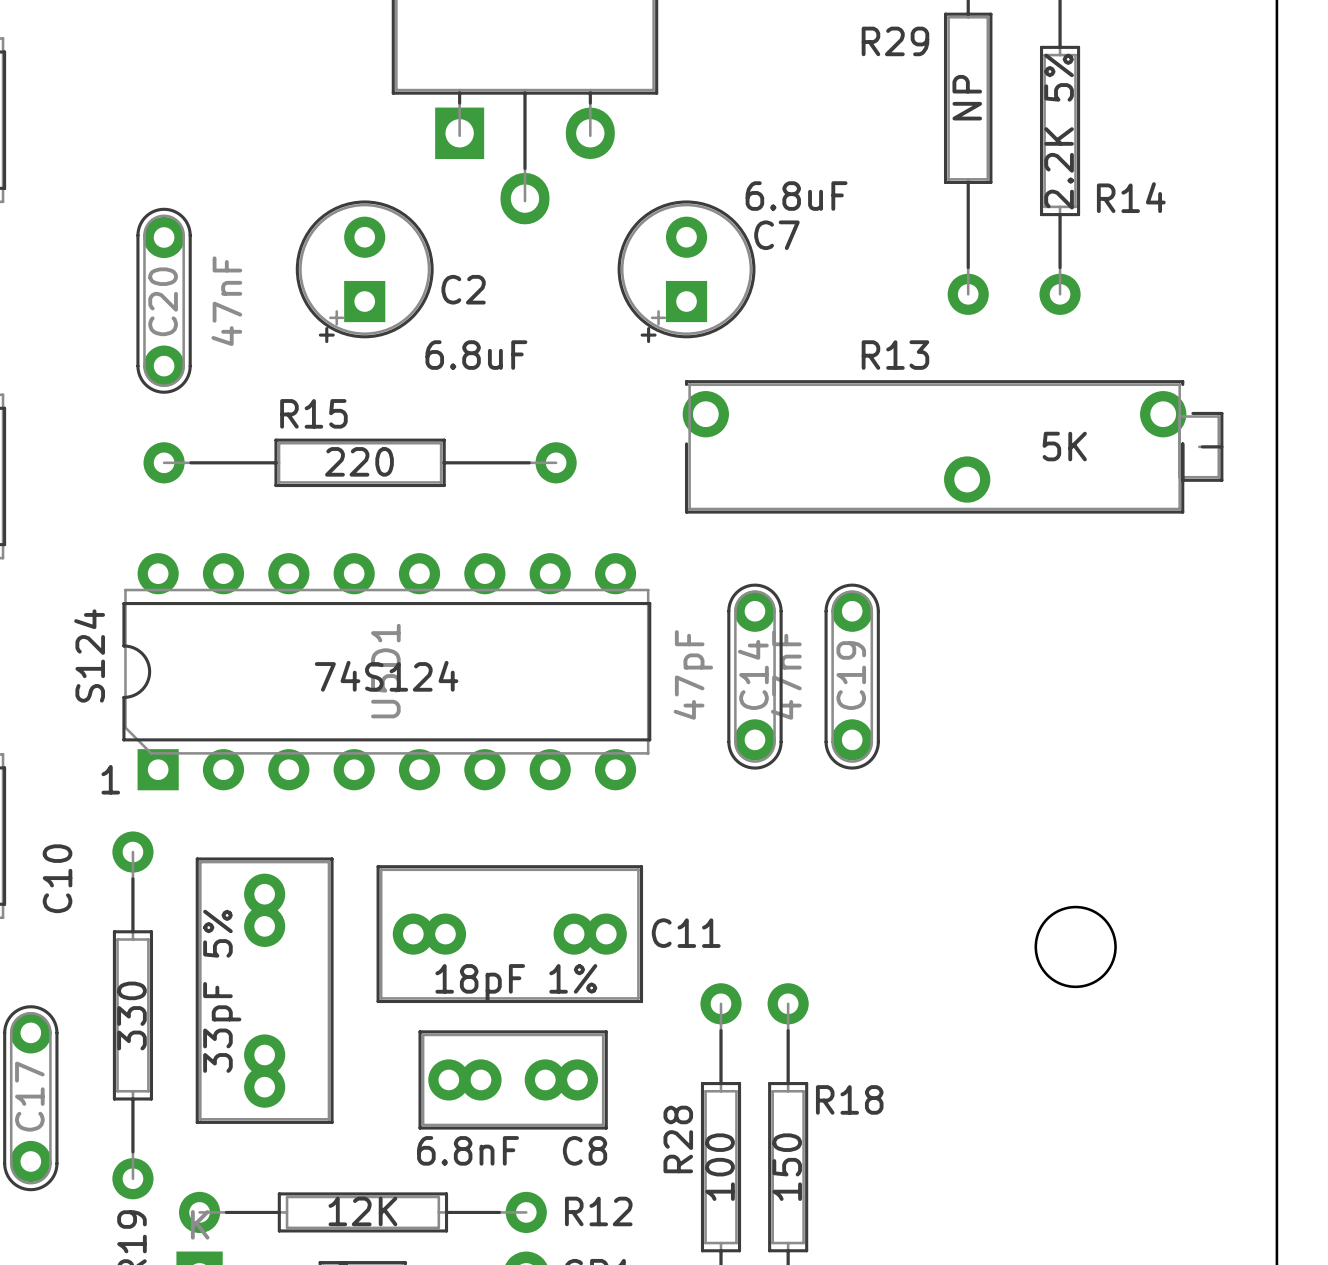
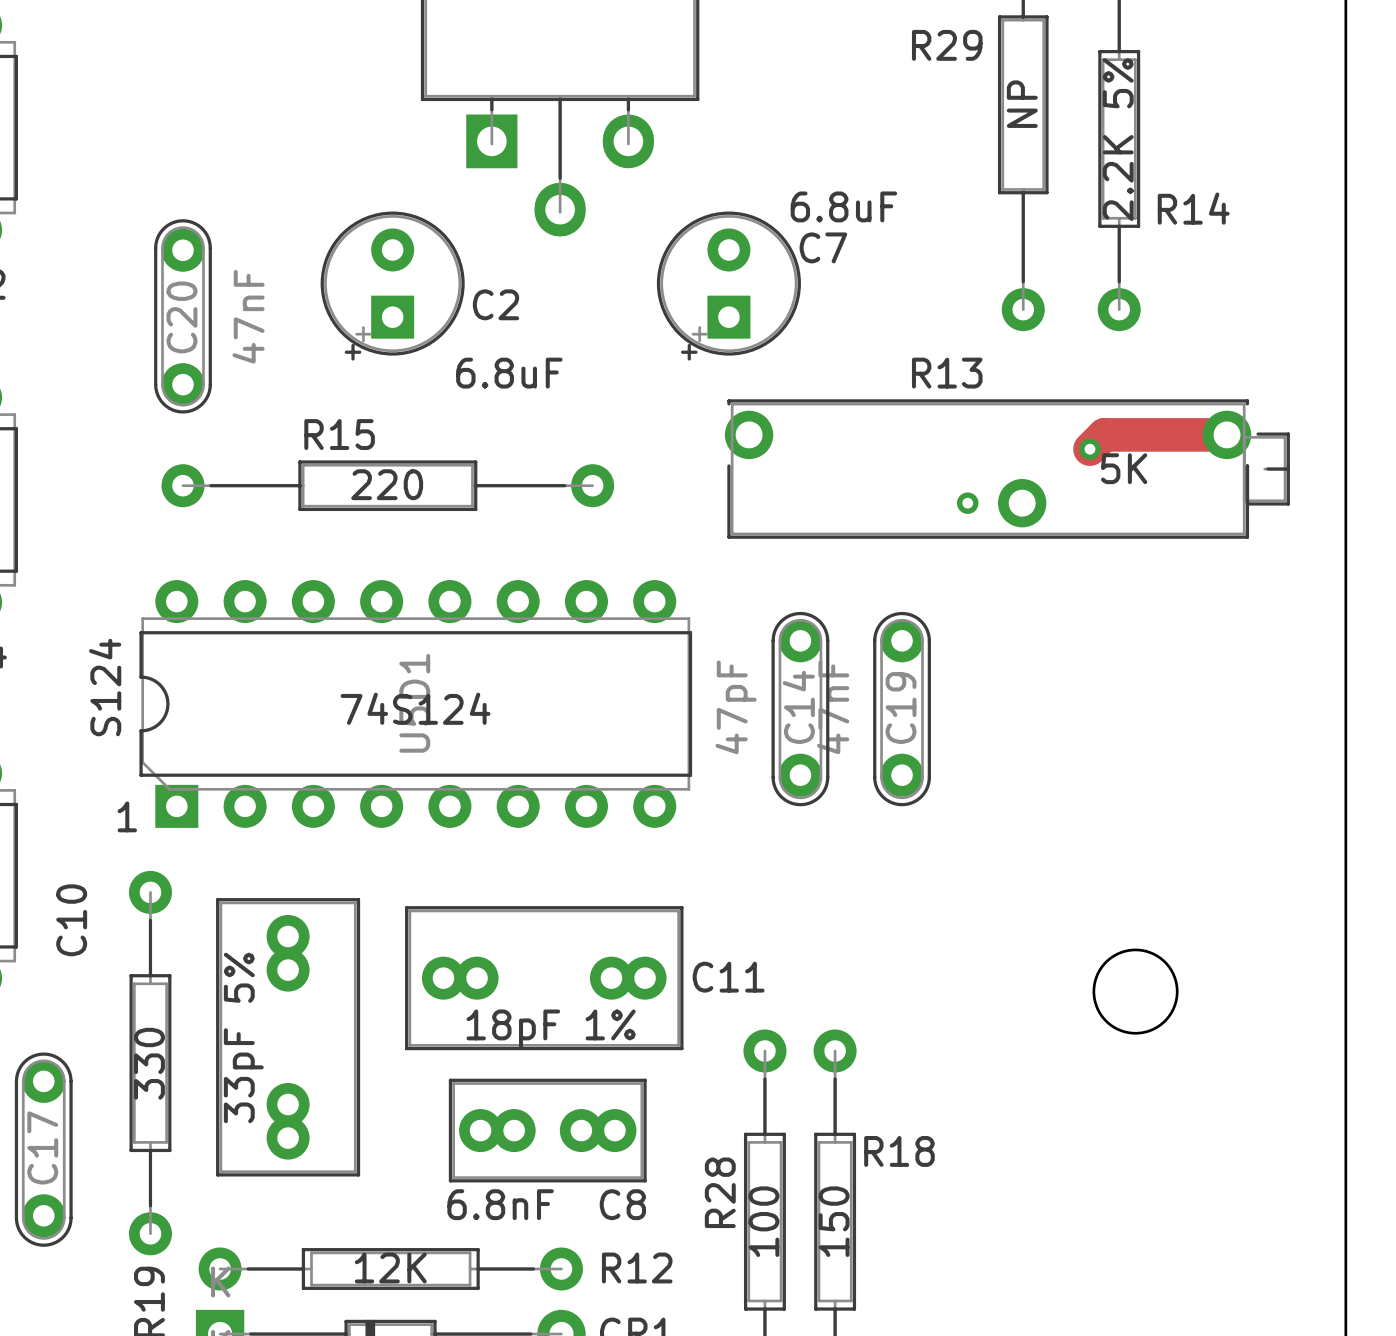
track: none -> (1227, 434) (1104, 434) (1089, 449)
via: none -> (1089, 449)
via: none -> (967, 503)

